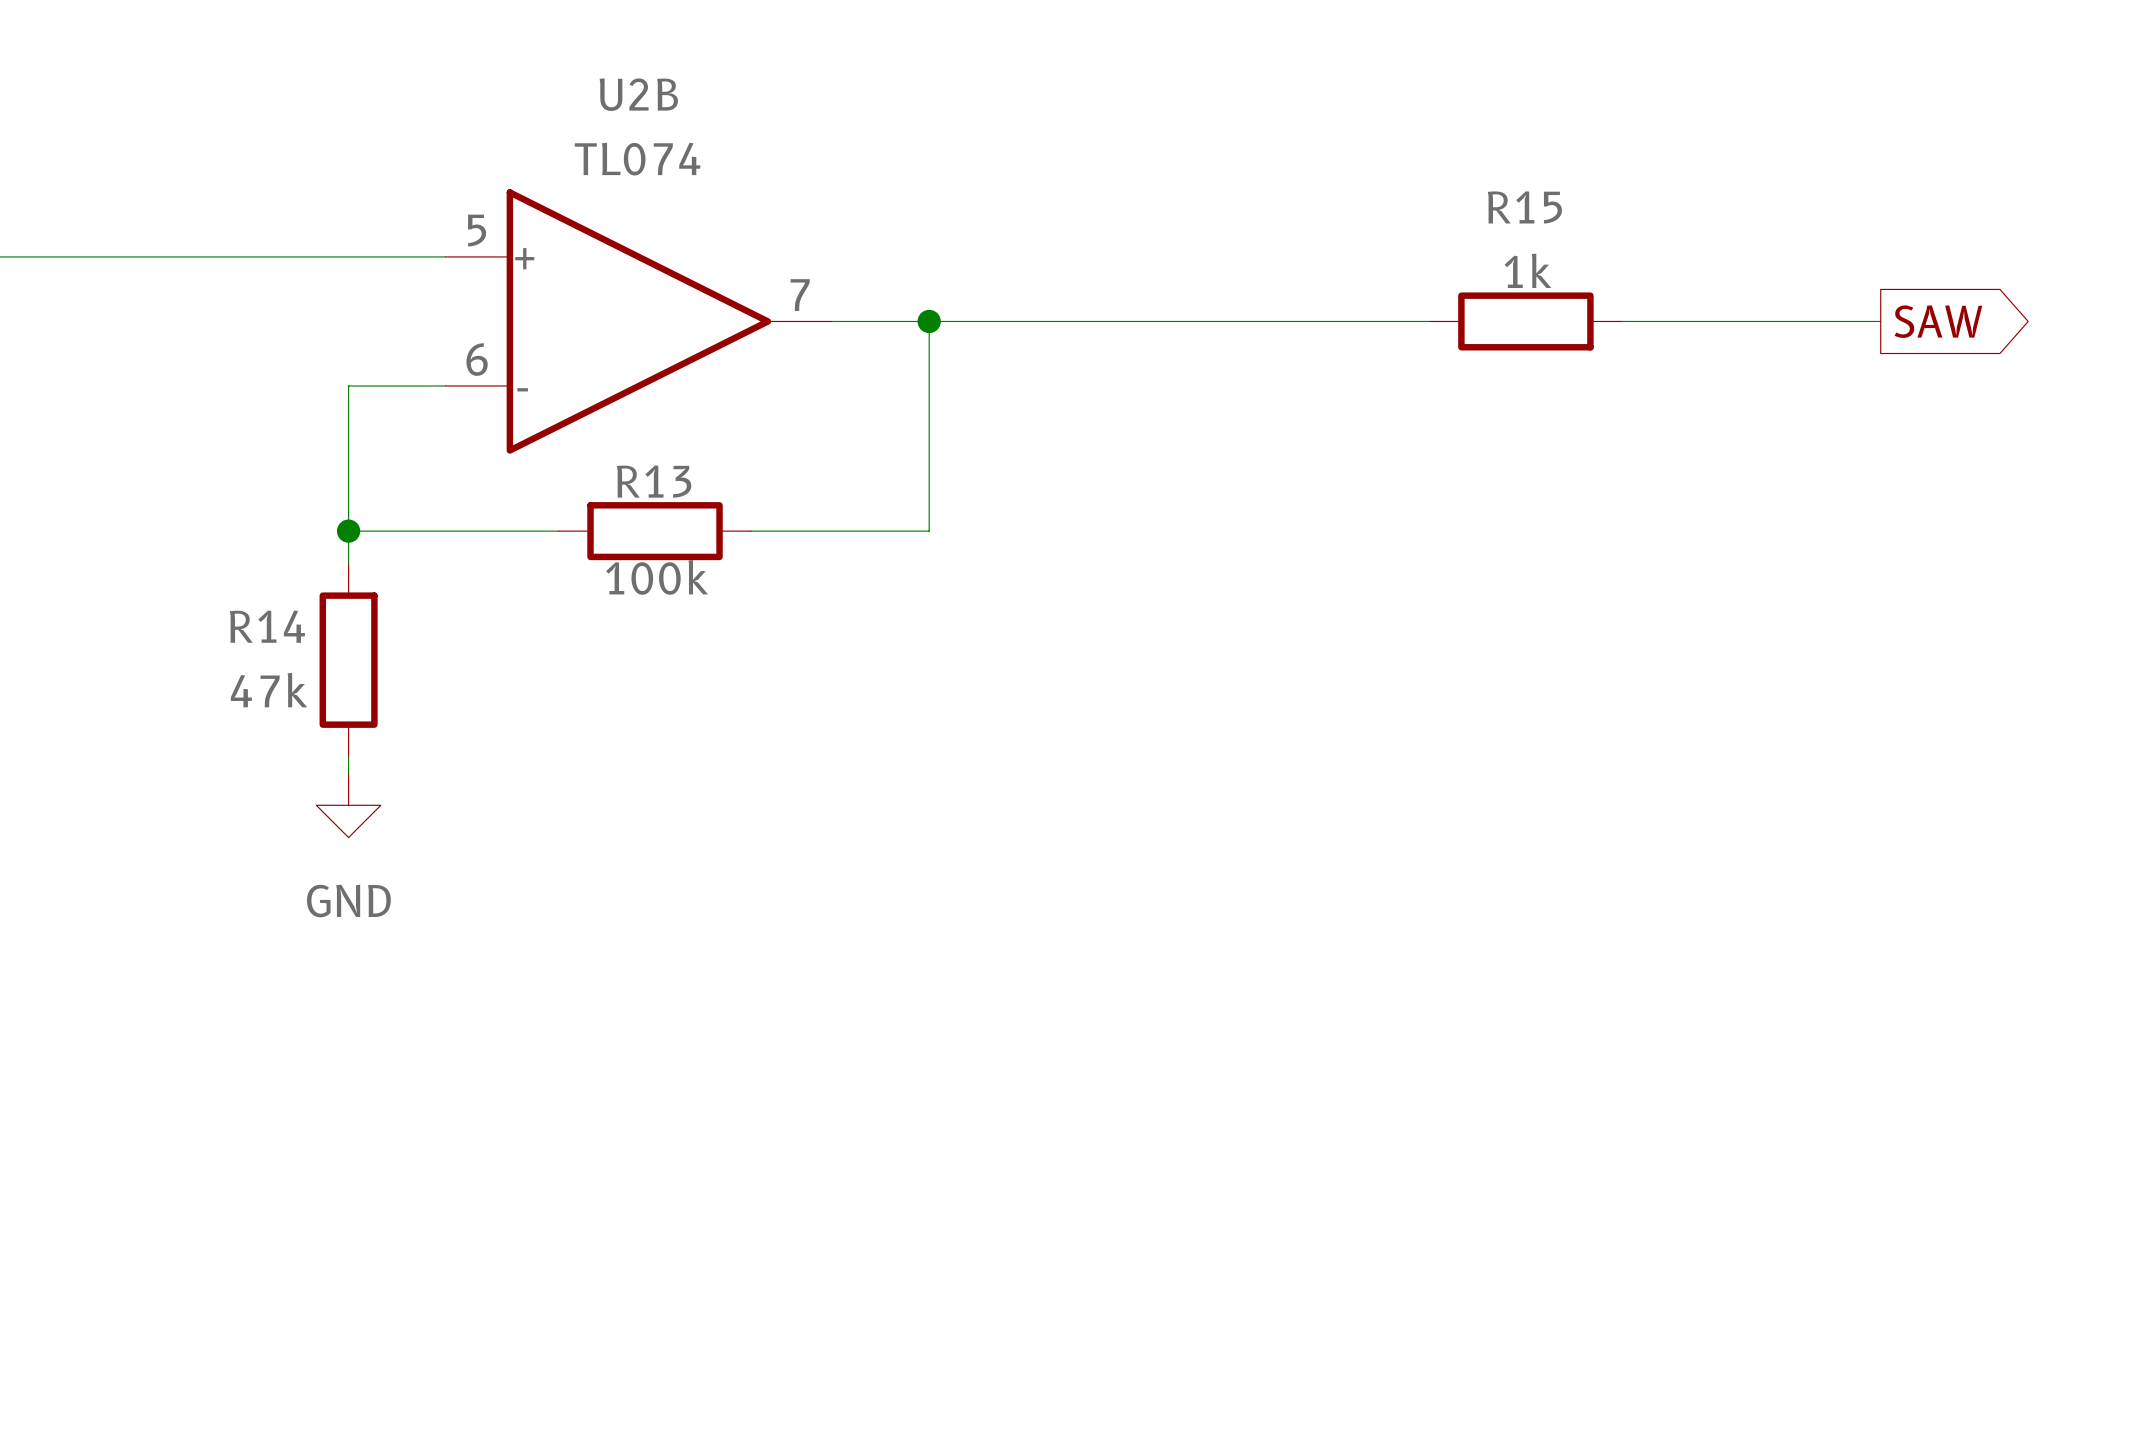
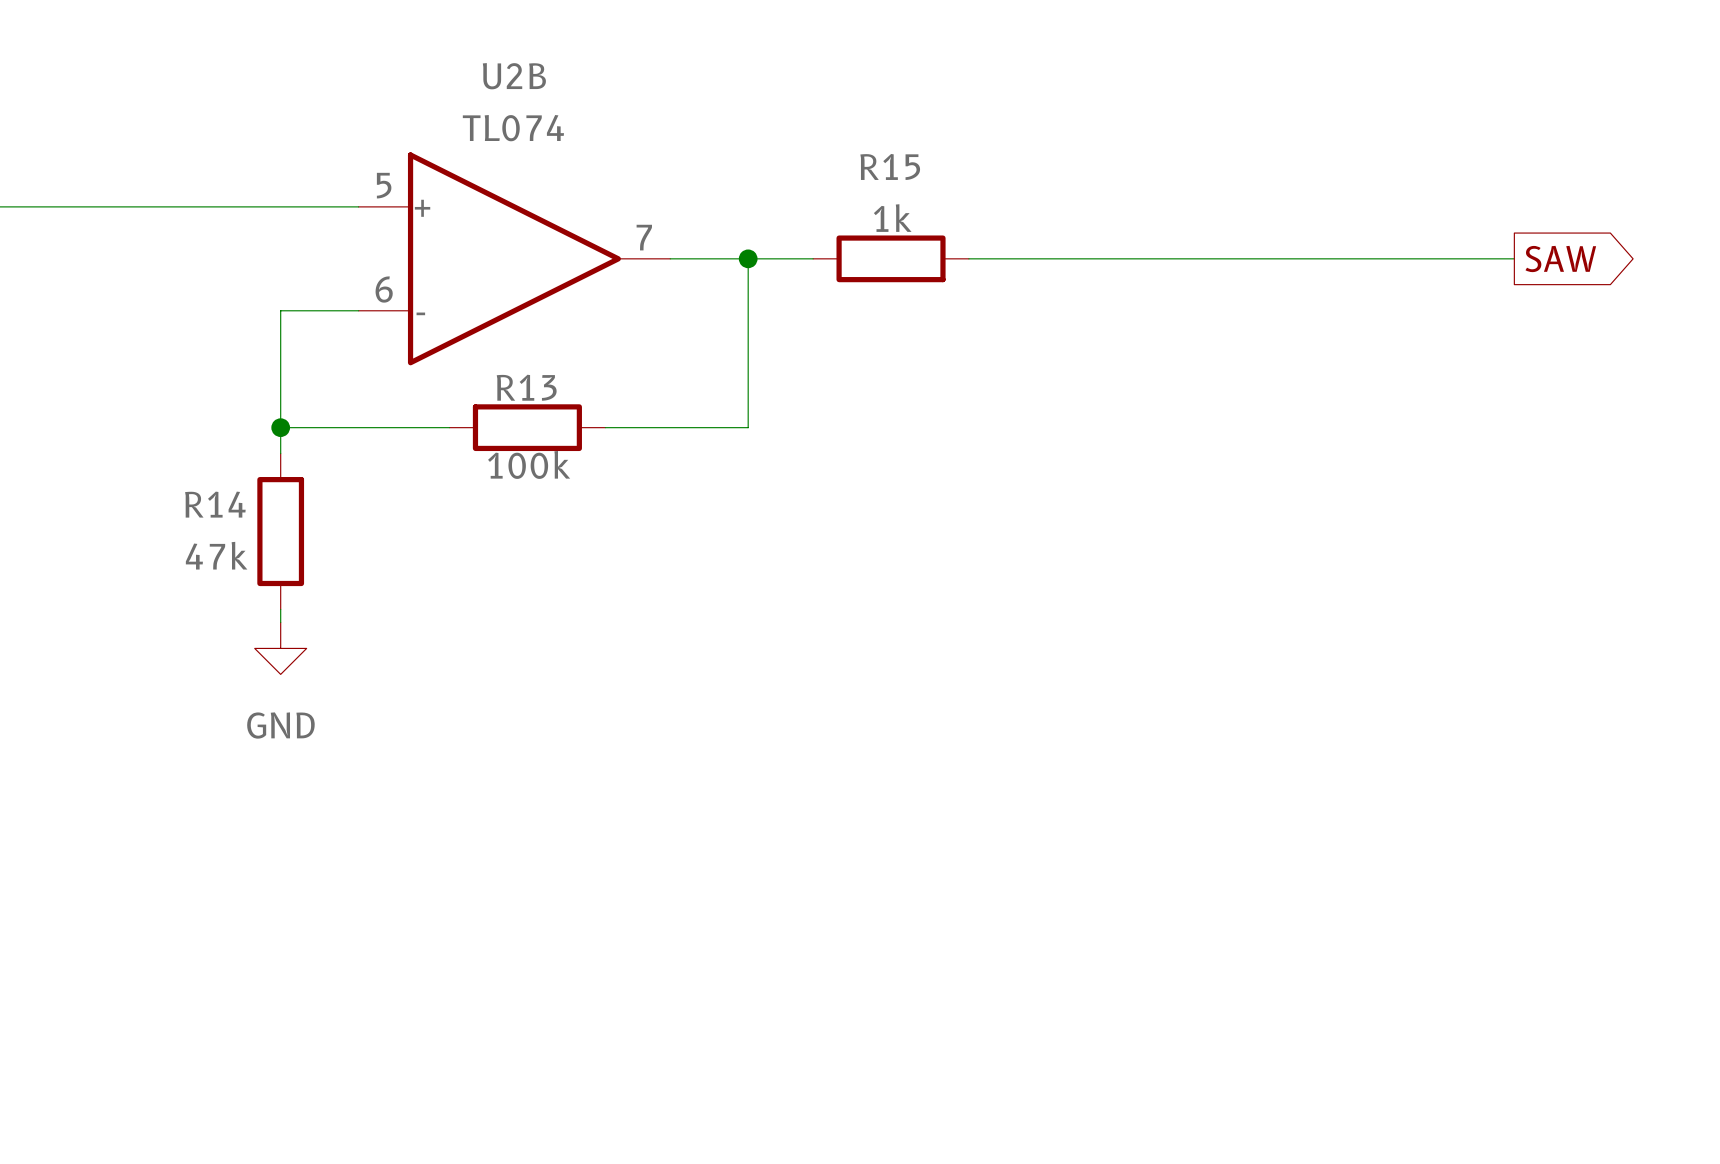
wire: (1009, 321) (1203, 321) -> (1150, 258) (1306, 258)
R15 position: (1525, 321) -> (891, 258)

